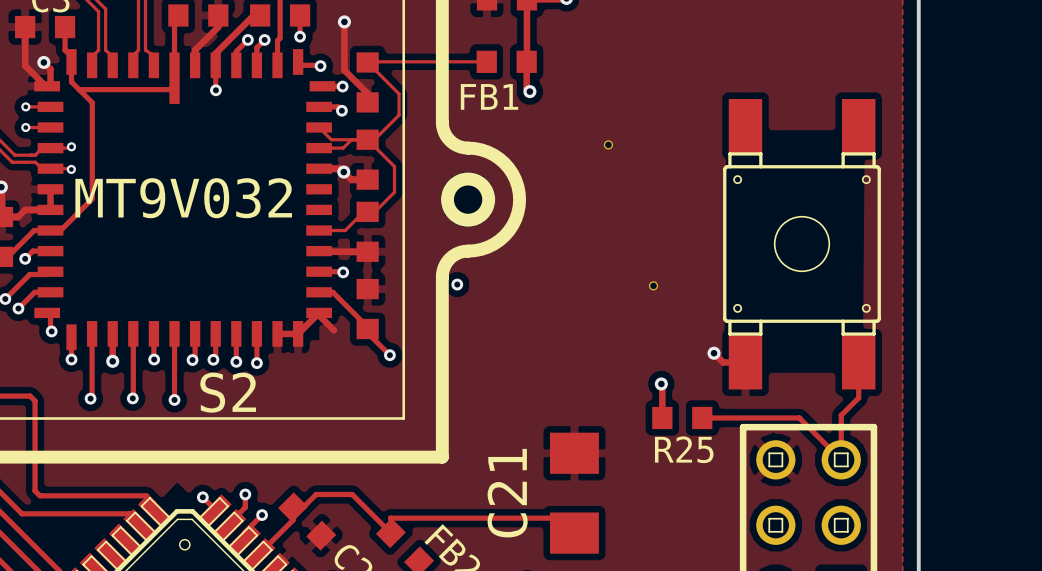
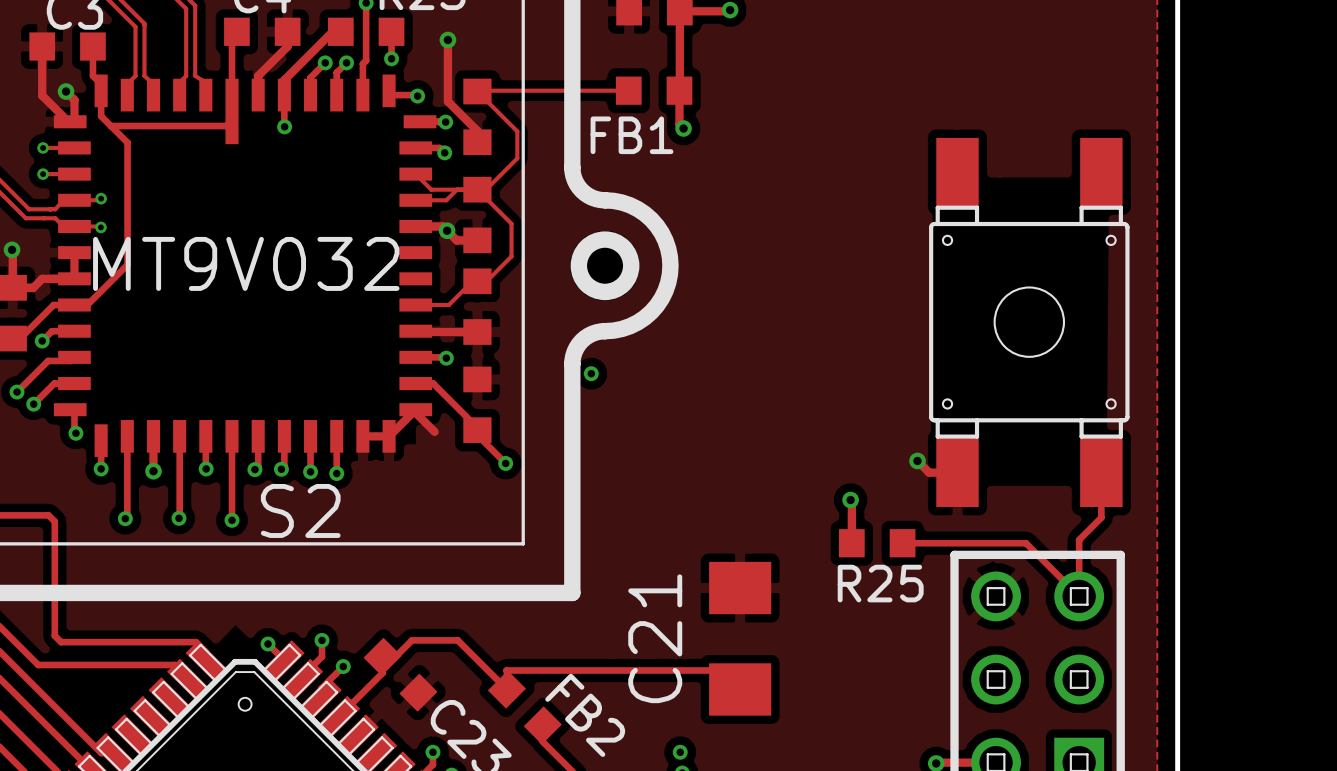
part: (608, 144) -> none
part: (653, 285) -> none

